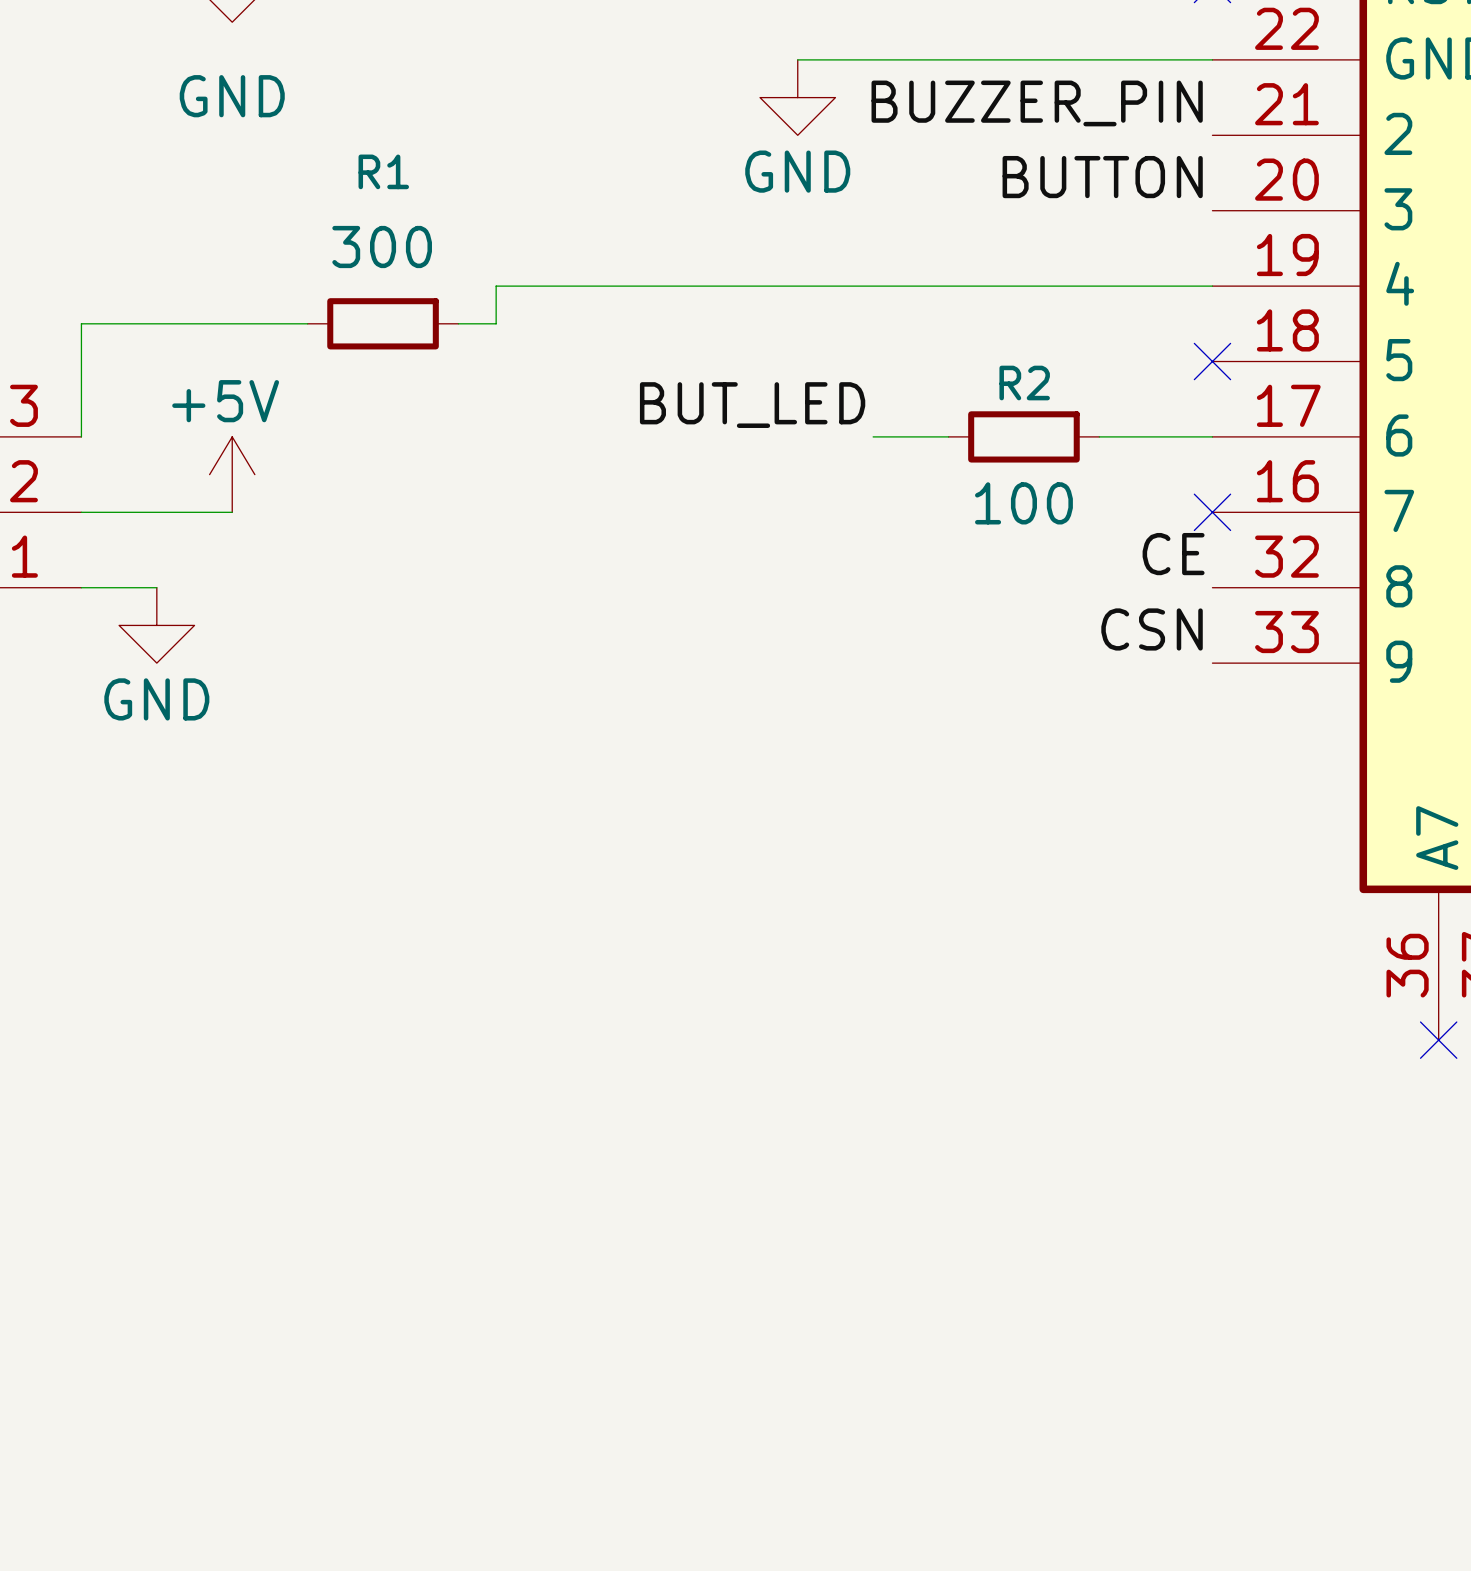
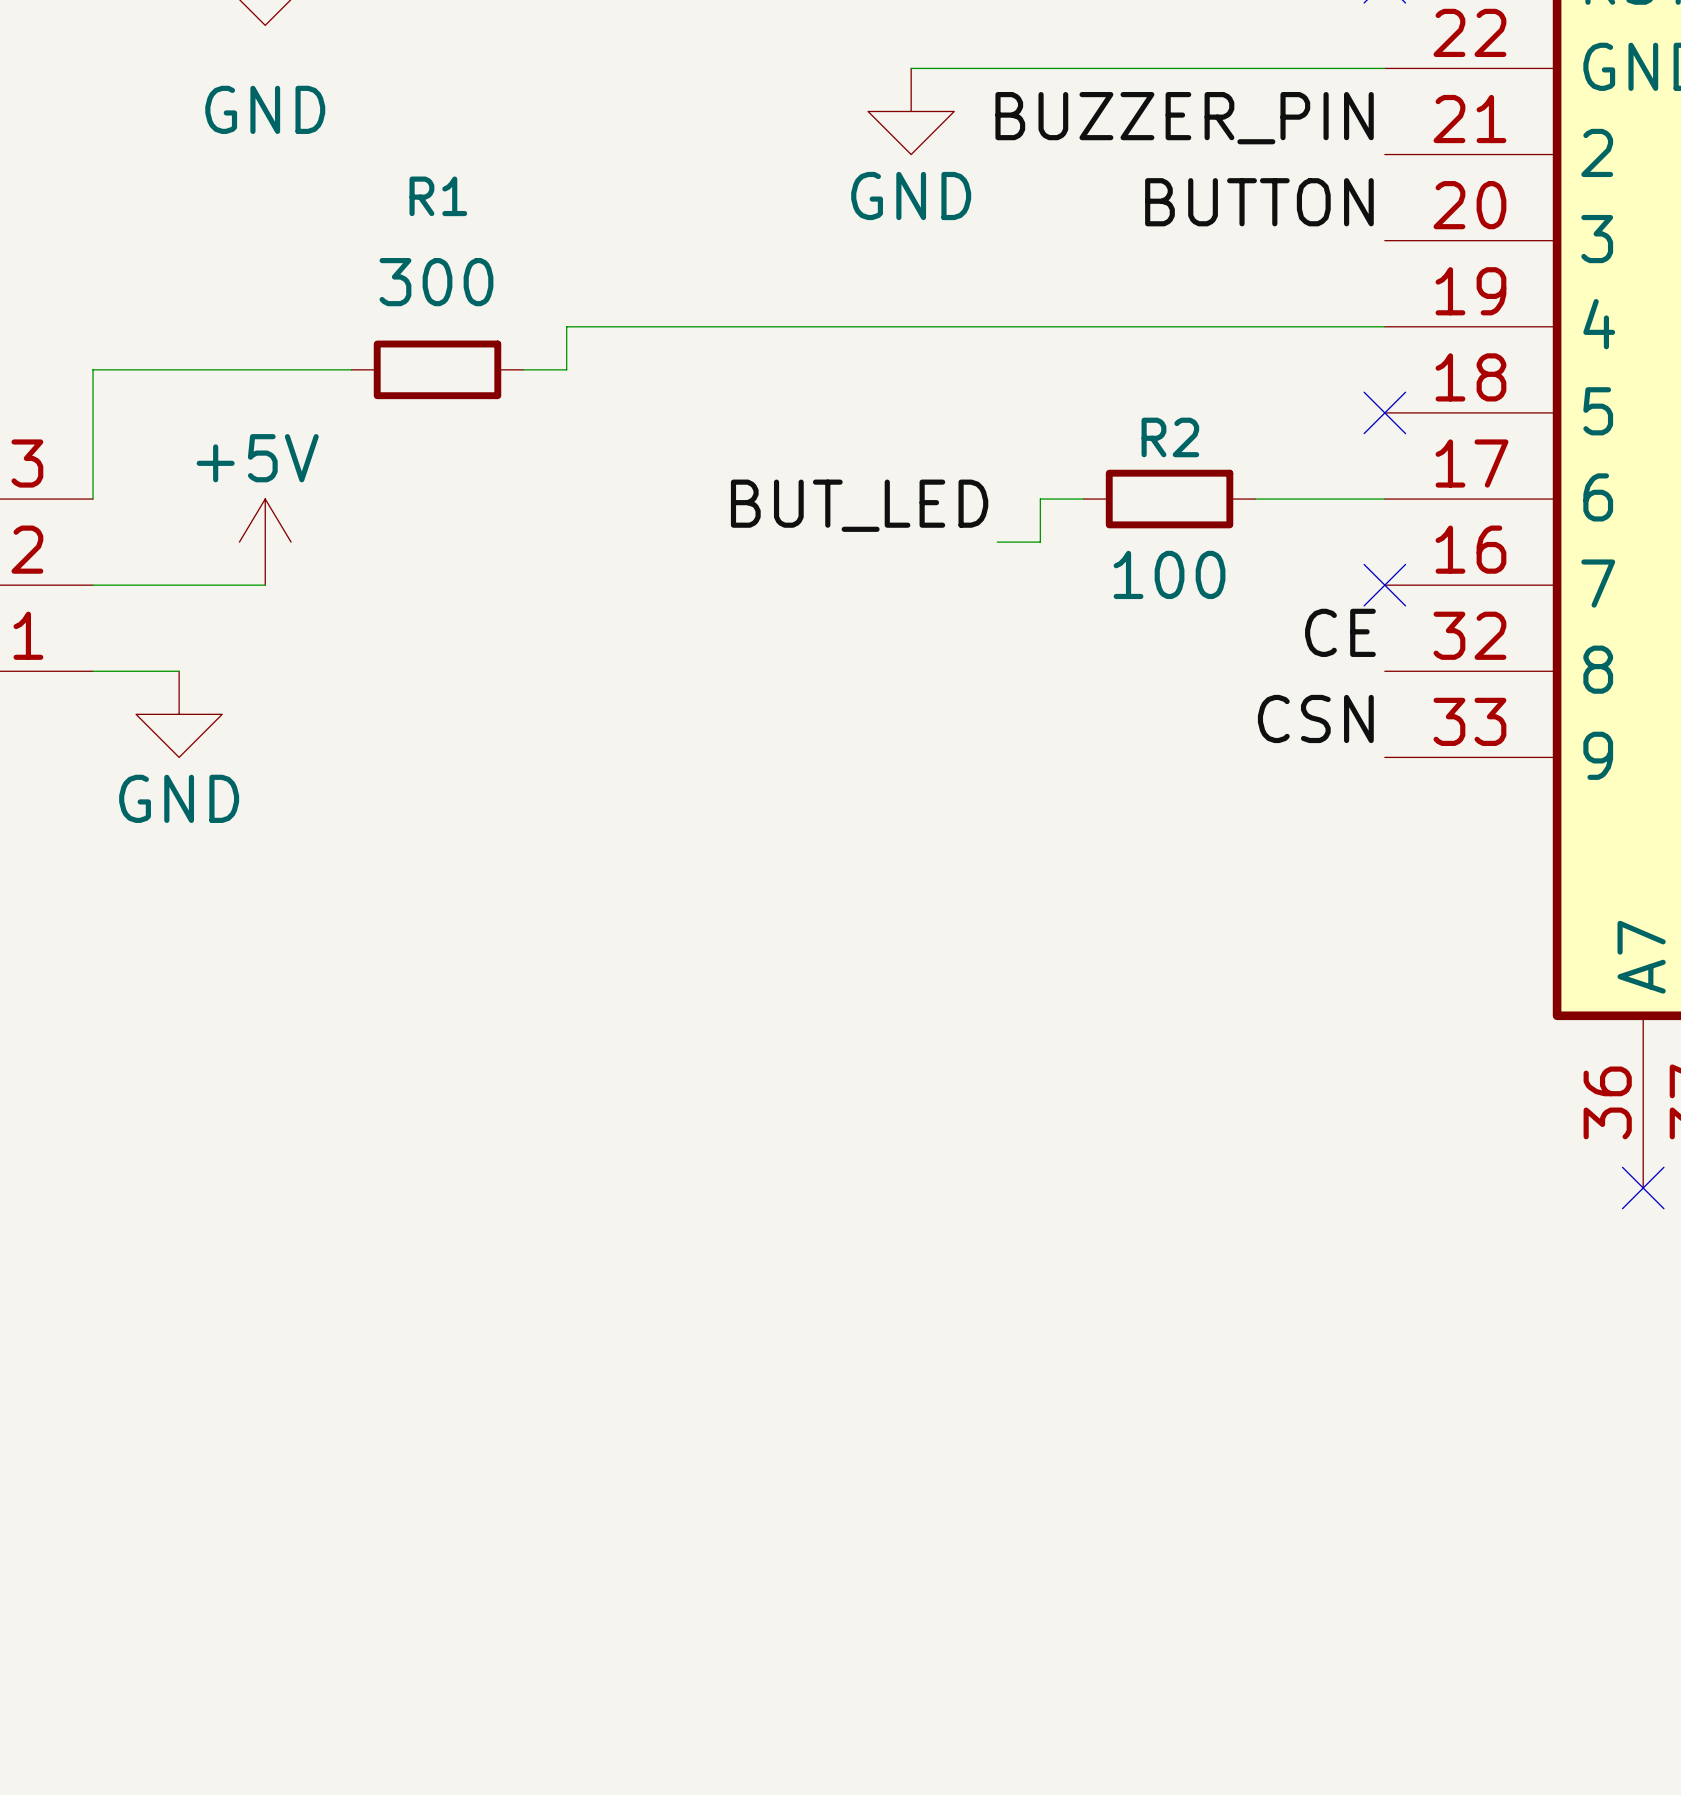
label position: BUT_LED (752, 405) -> BUT_LED (859, 505)
wire: (873, 436) (910, 436) -> (997, 542) (1040, 542) (1040, 499)

